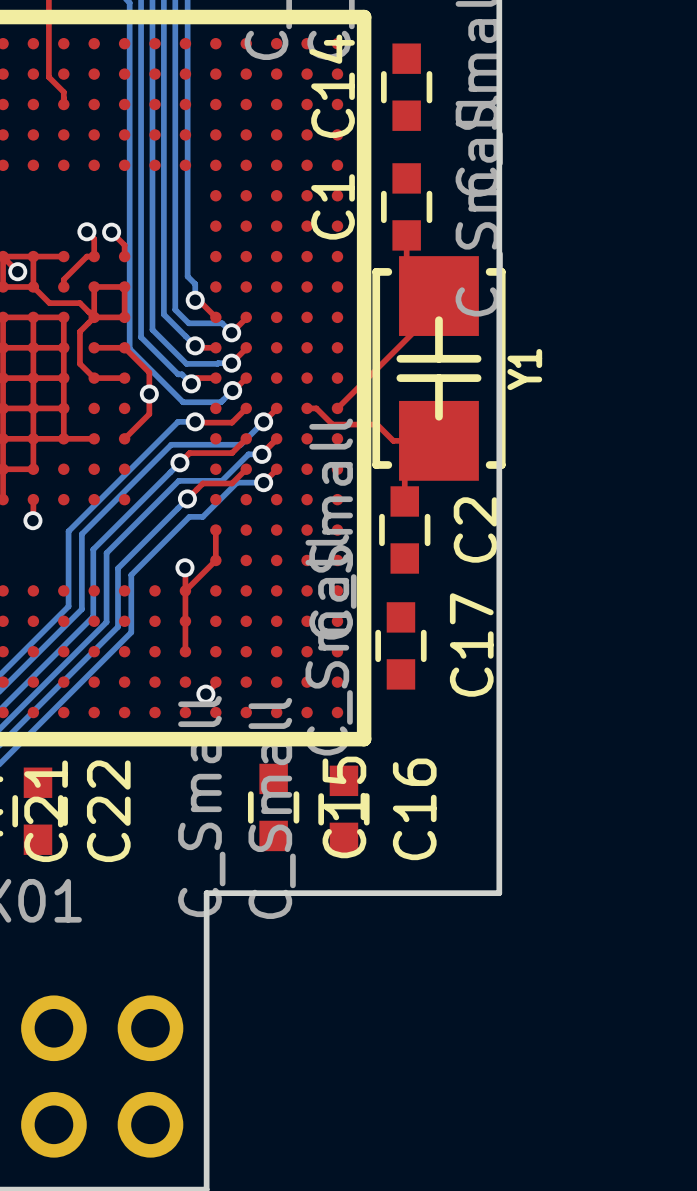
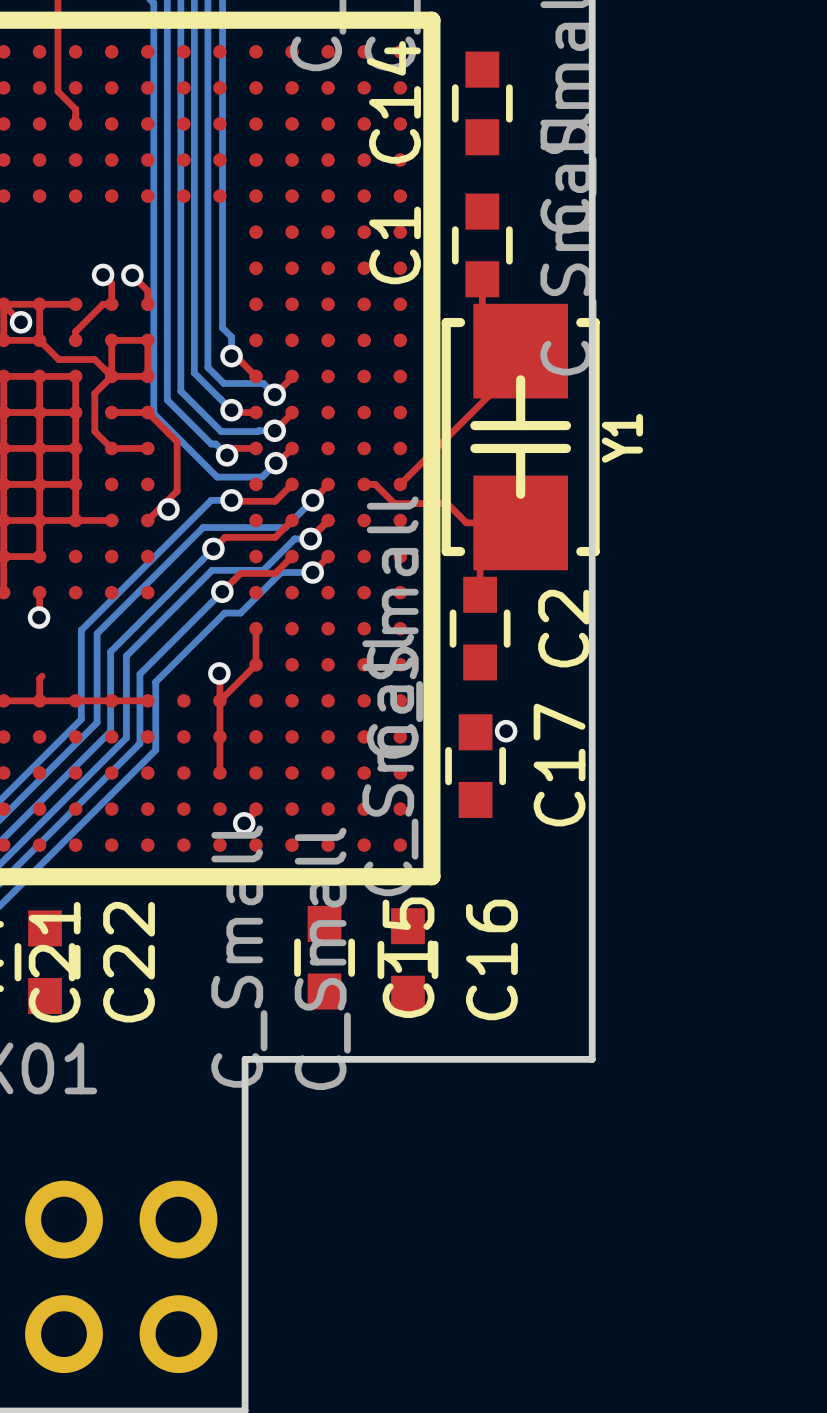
via position: (149, 394) -> (168, 509)
top track: none -> (42, 676) (39, 678) (39, 700)
top track: none -> (3, 700) (147, 700)
via: none -> (506, 731)

